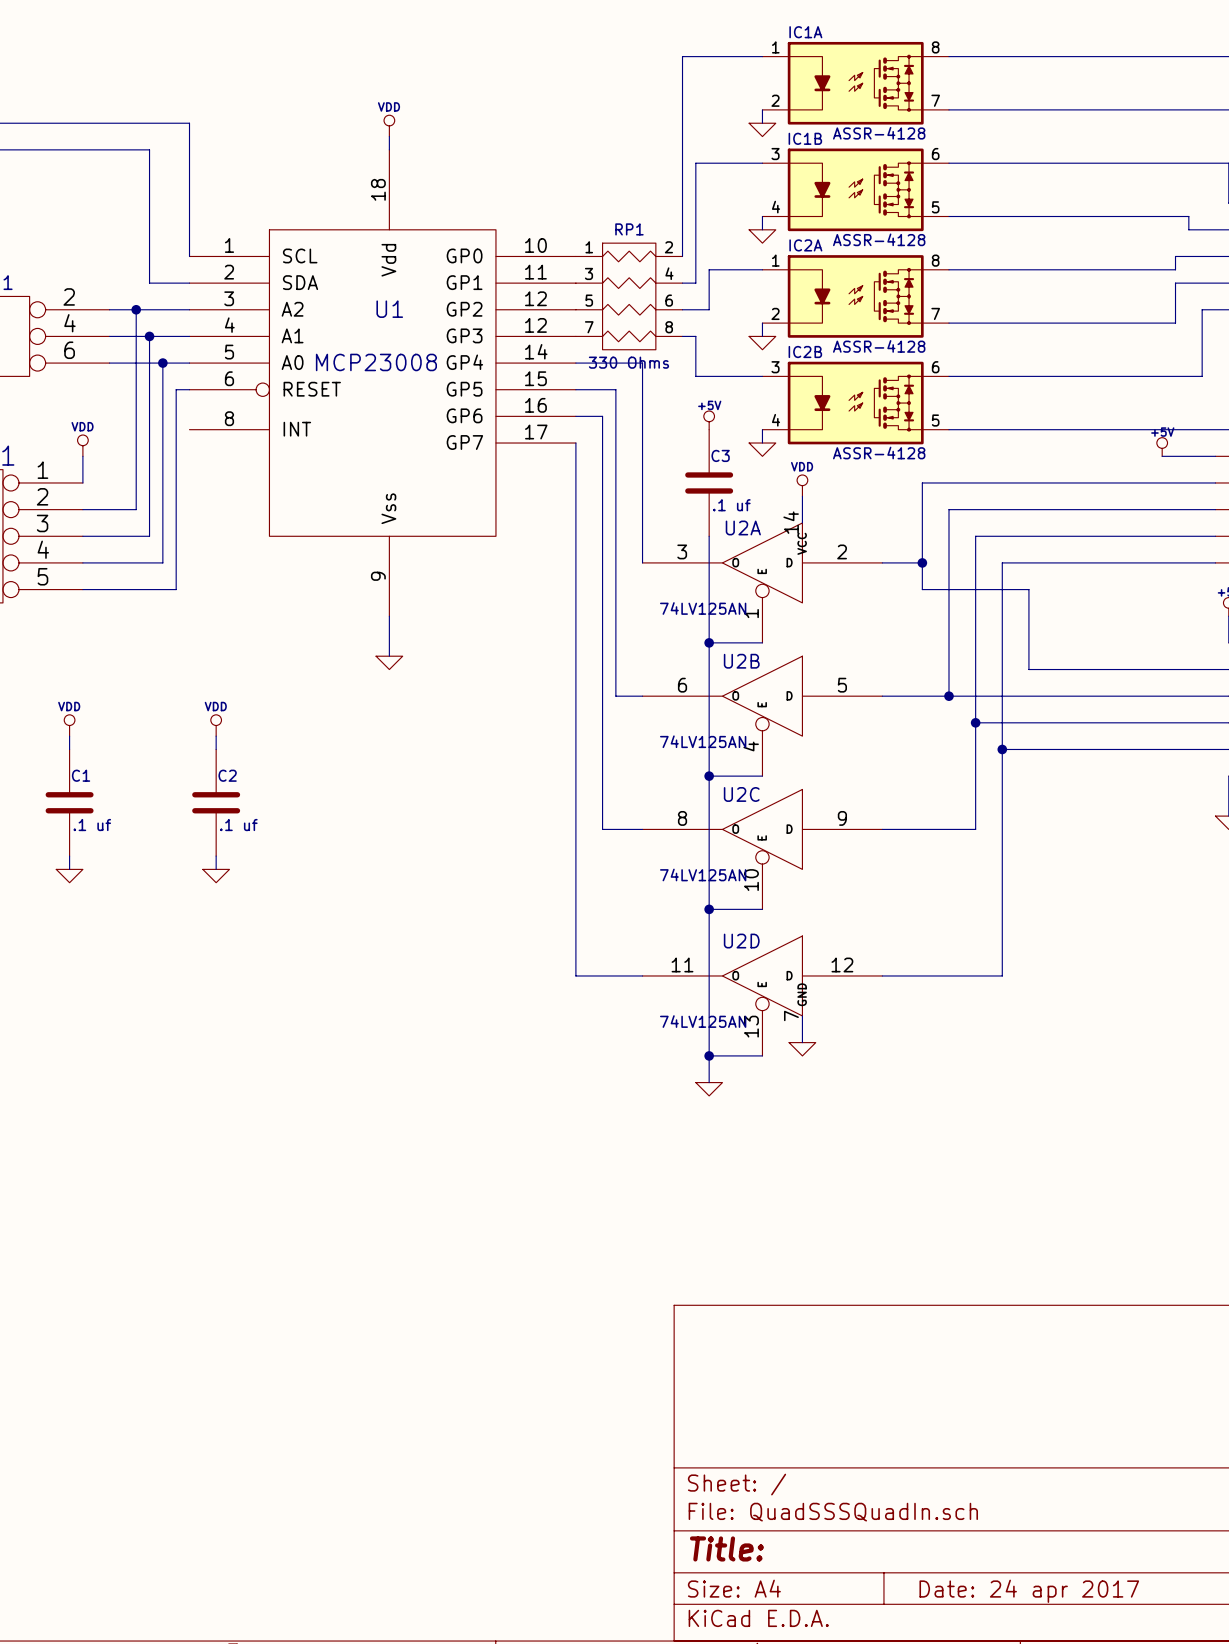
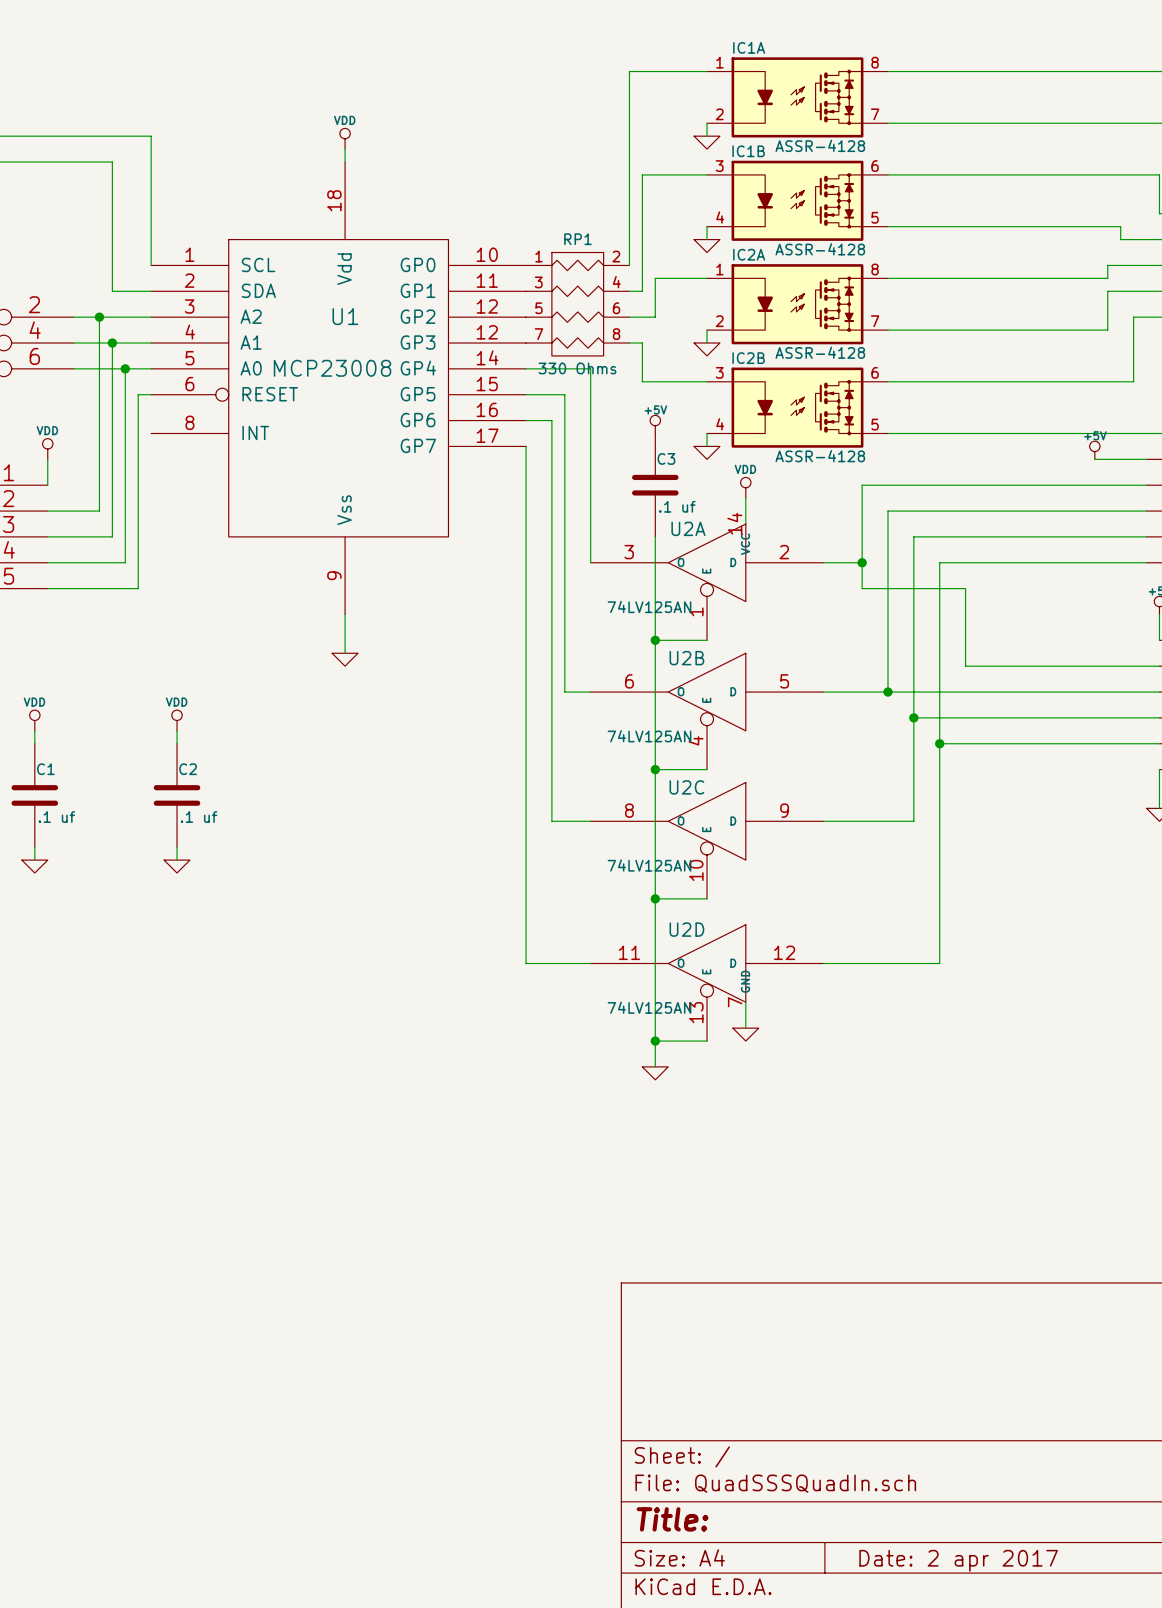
title block: Date: 24 apr 2017 (1029, 1591) -> Date: 2 apr 2017 (958, 1560)

